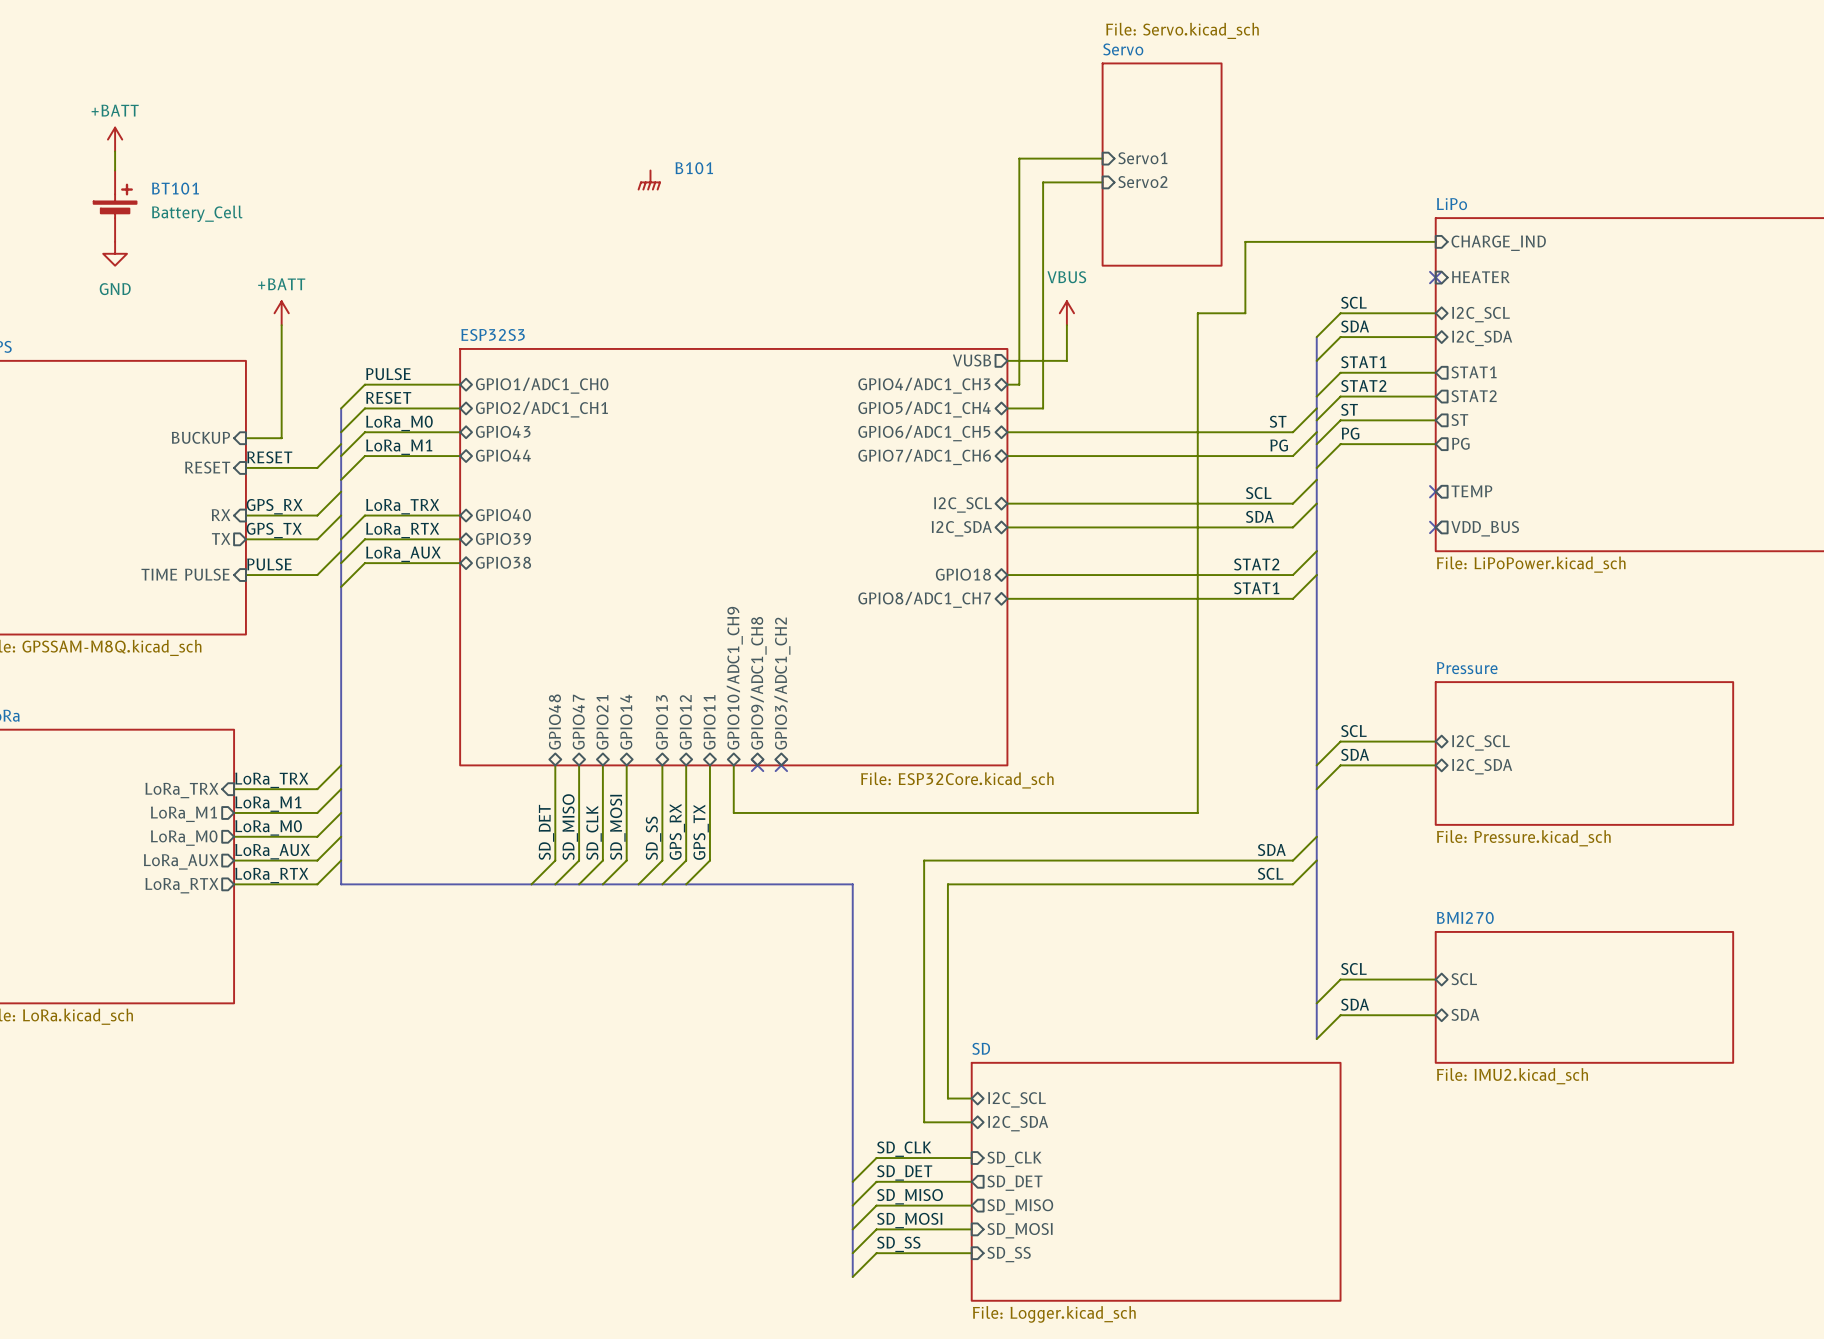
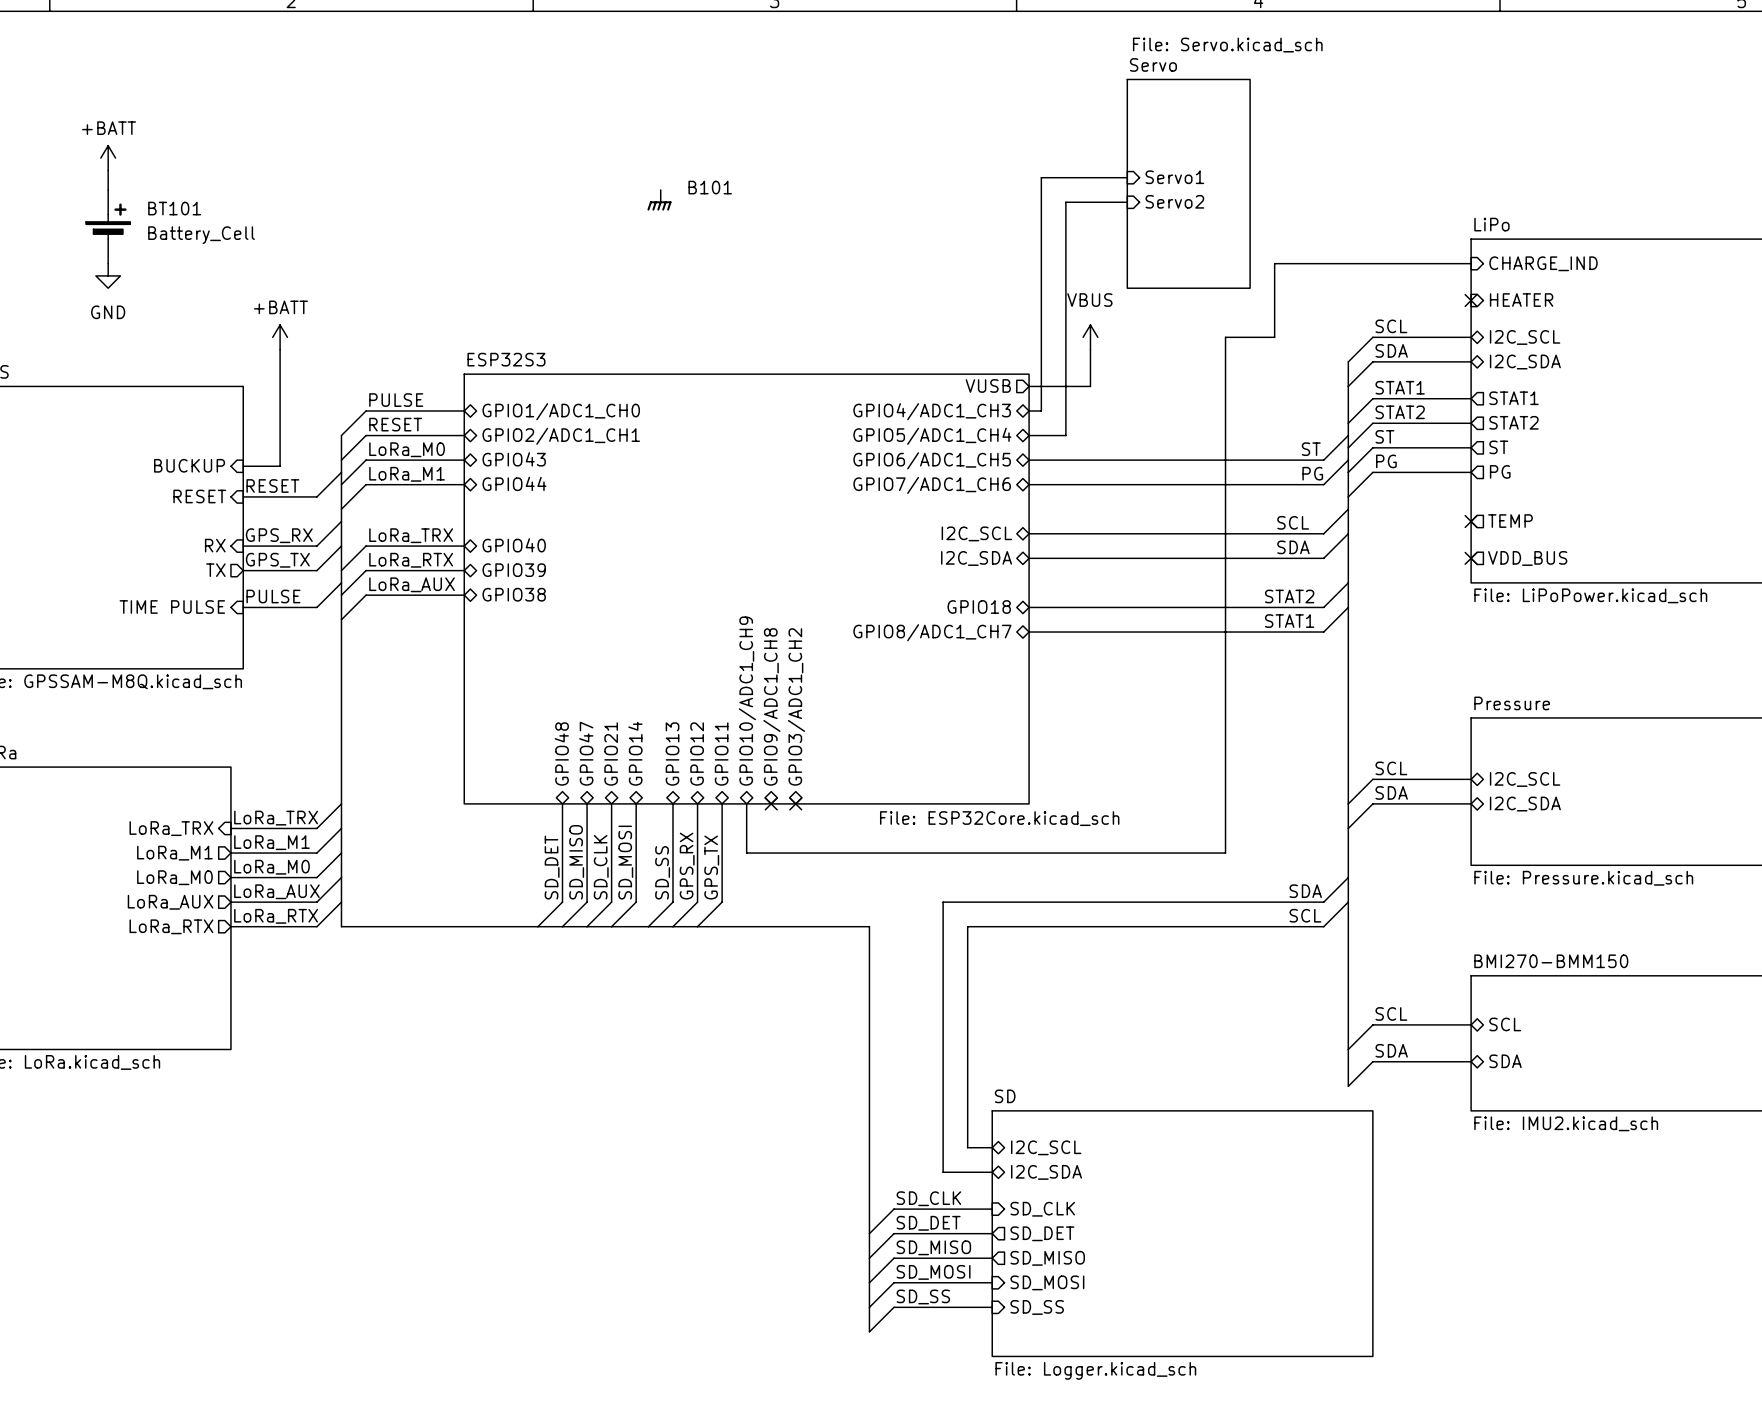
sheet BMI270 name: BMI270 (1465, 917) -> BMI270-BMM150 (1551, 961)

